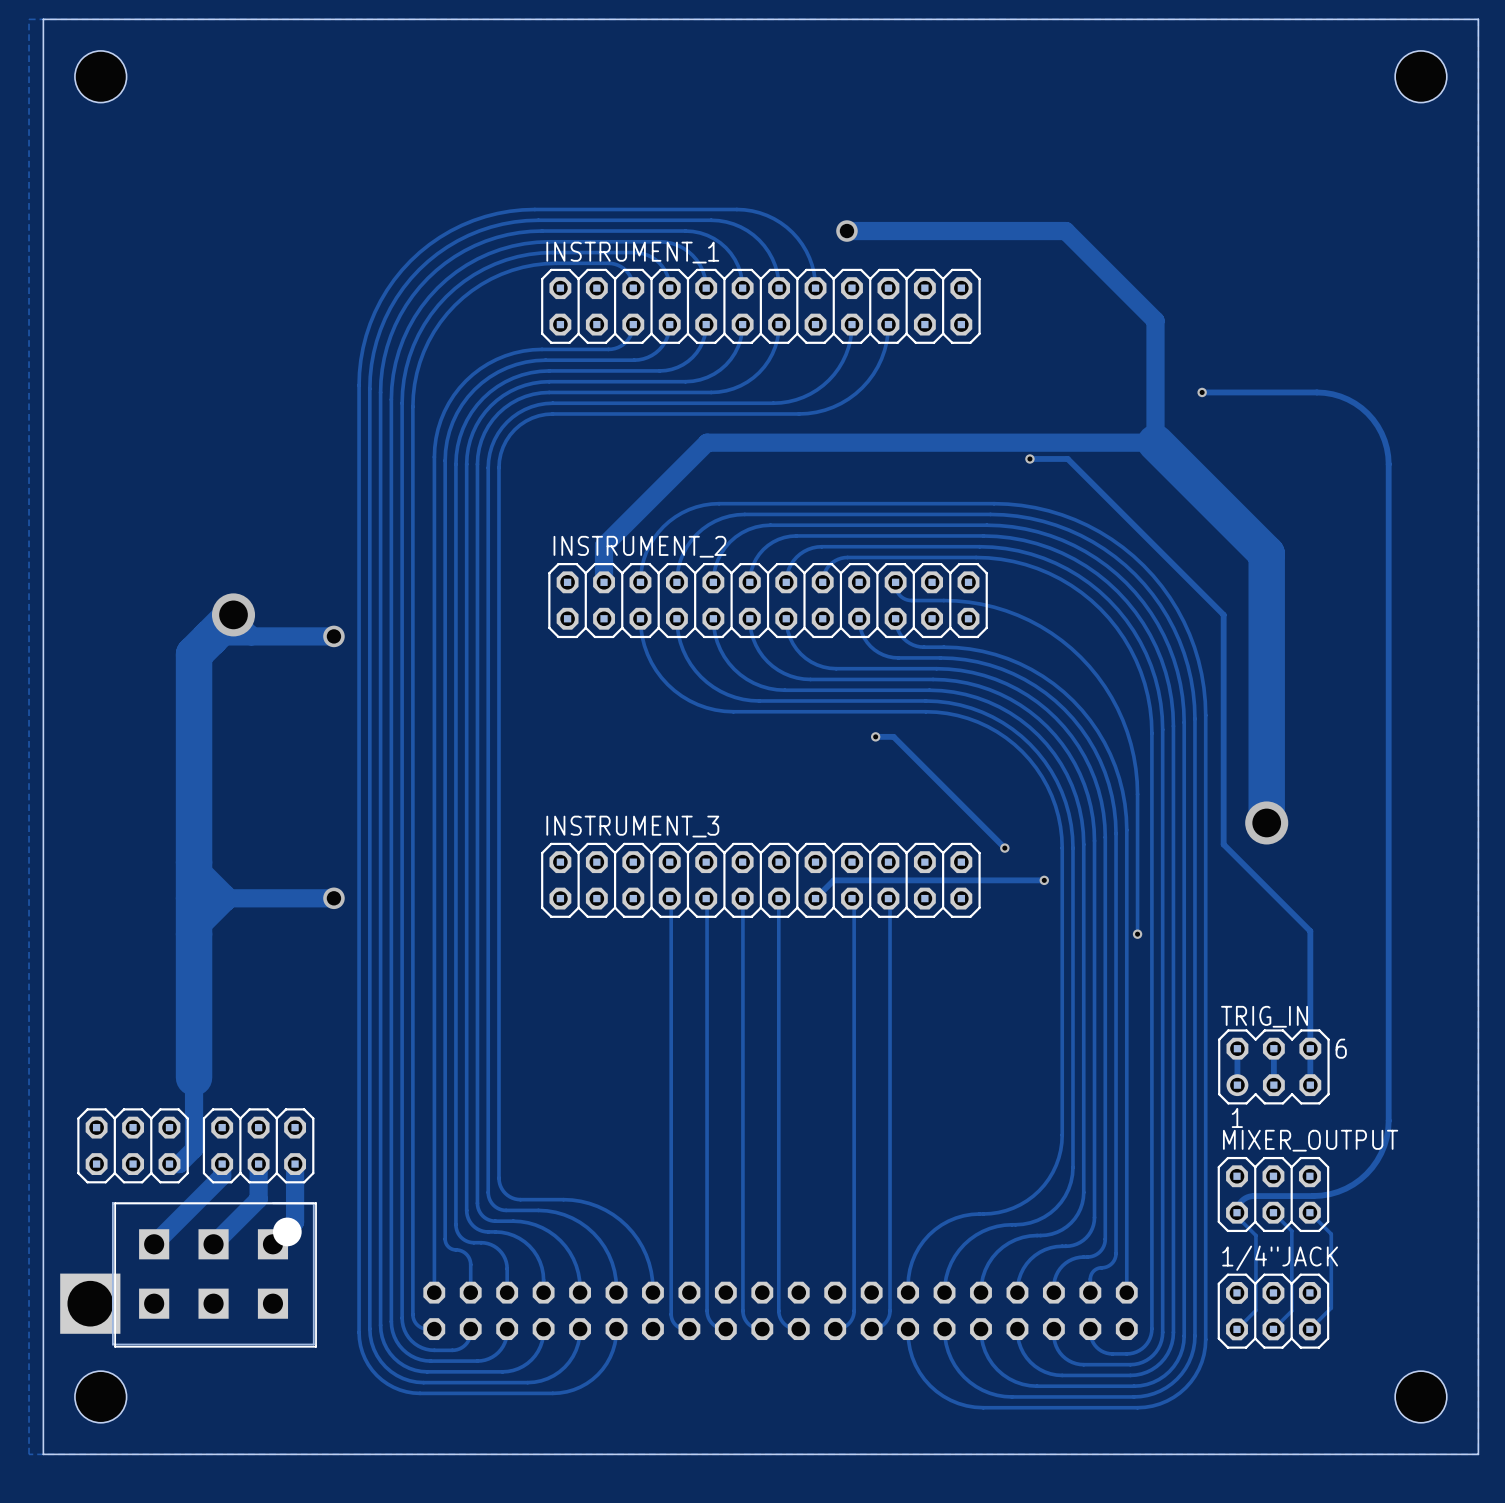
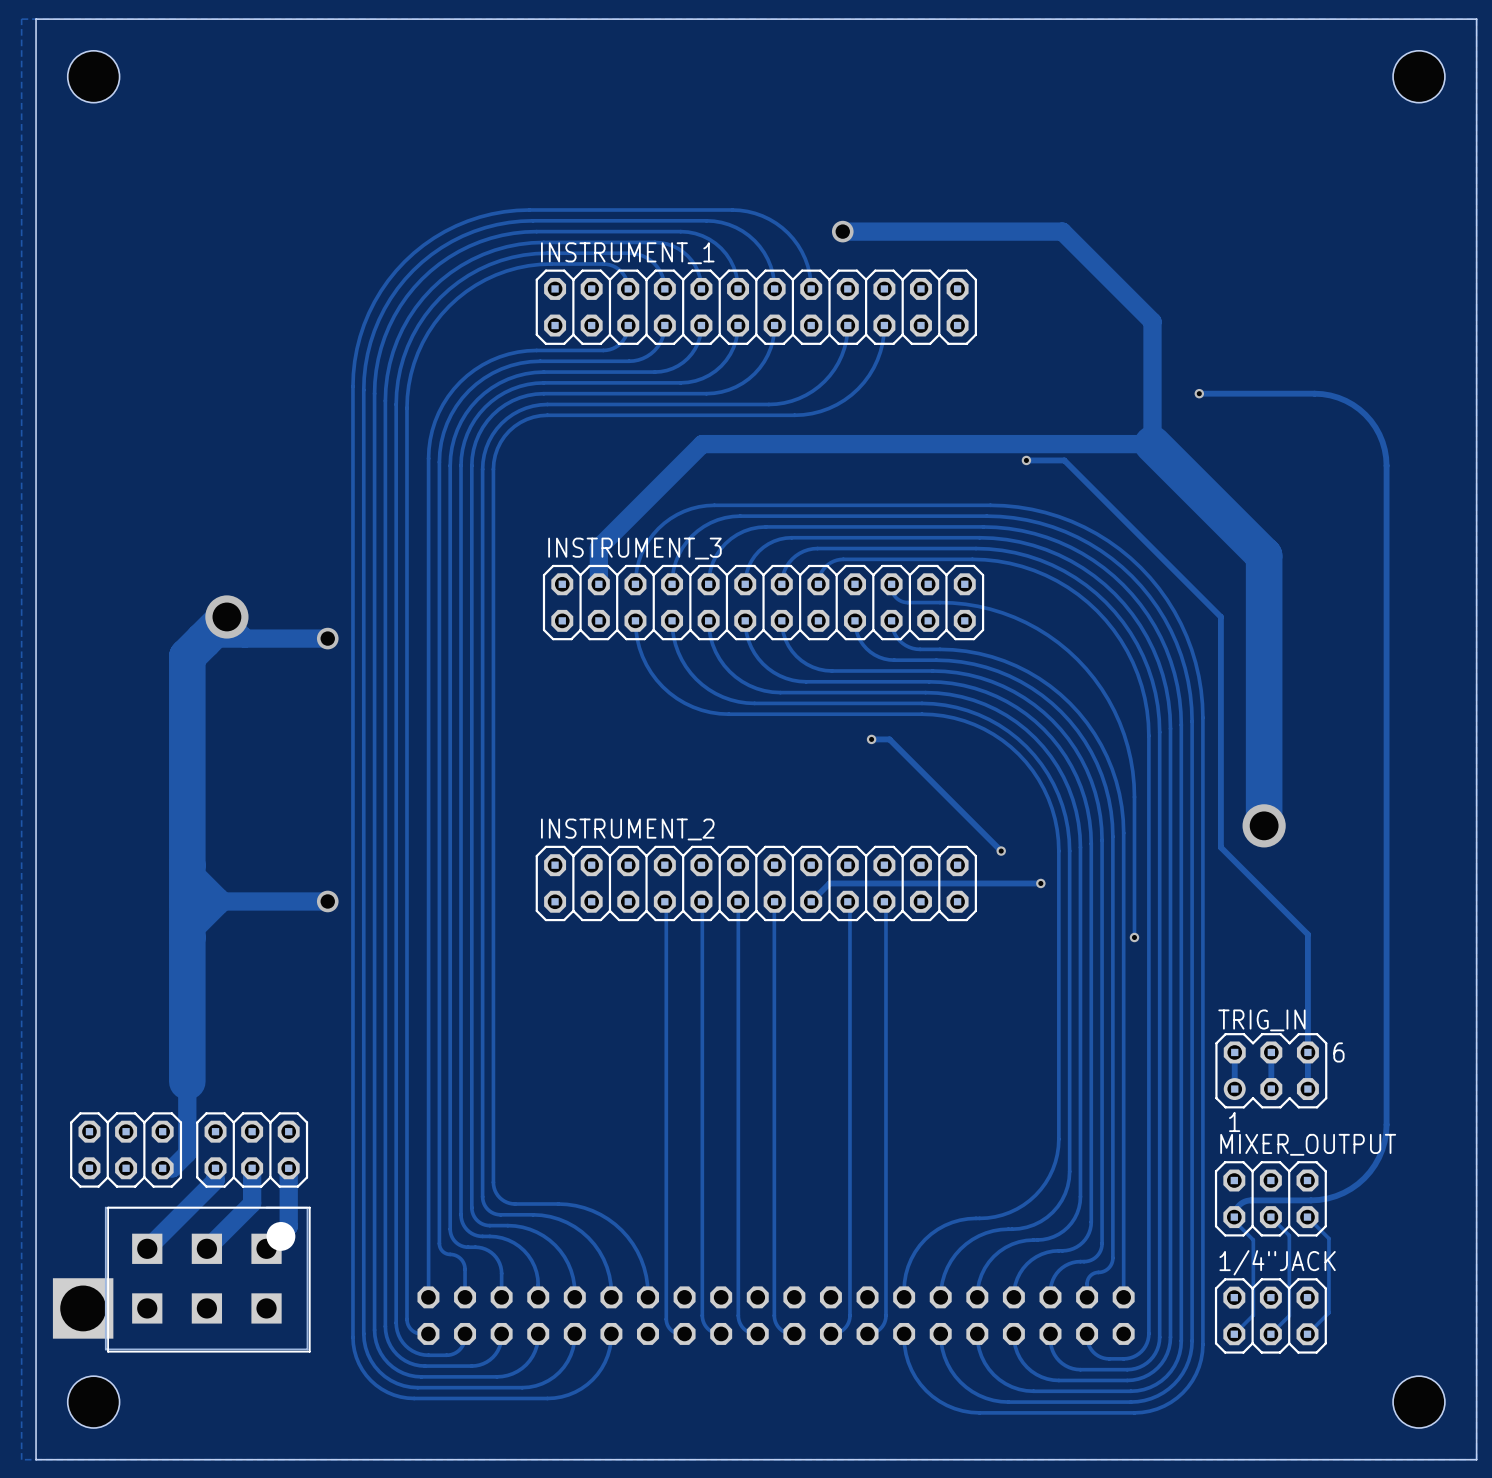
INSTRUMENT_2 name: INSTRUMENT_2 (639, 546) -> INSTRUMENT_3 (634, 548)
INSTRUMENT_3 name: INSTRUMENT_3 (632, 826) -> INSTRUMENT_2 (627, 829)

